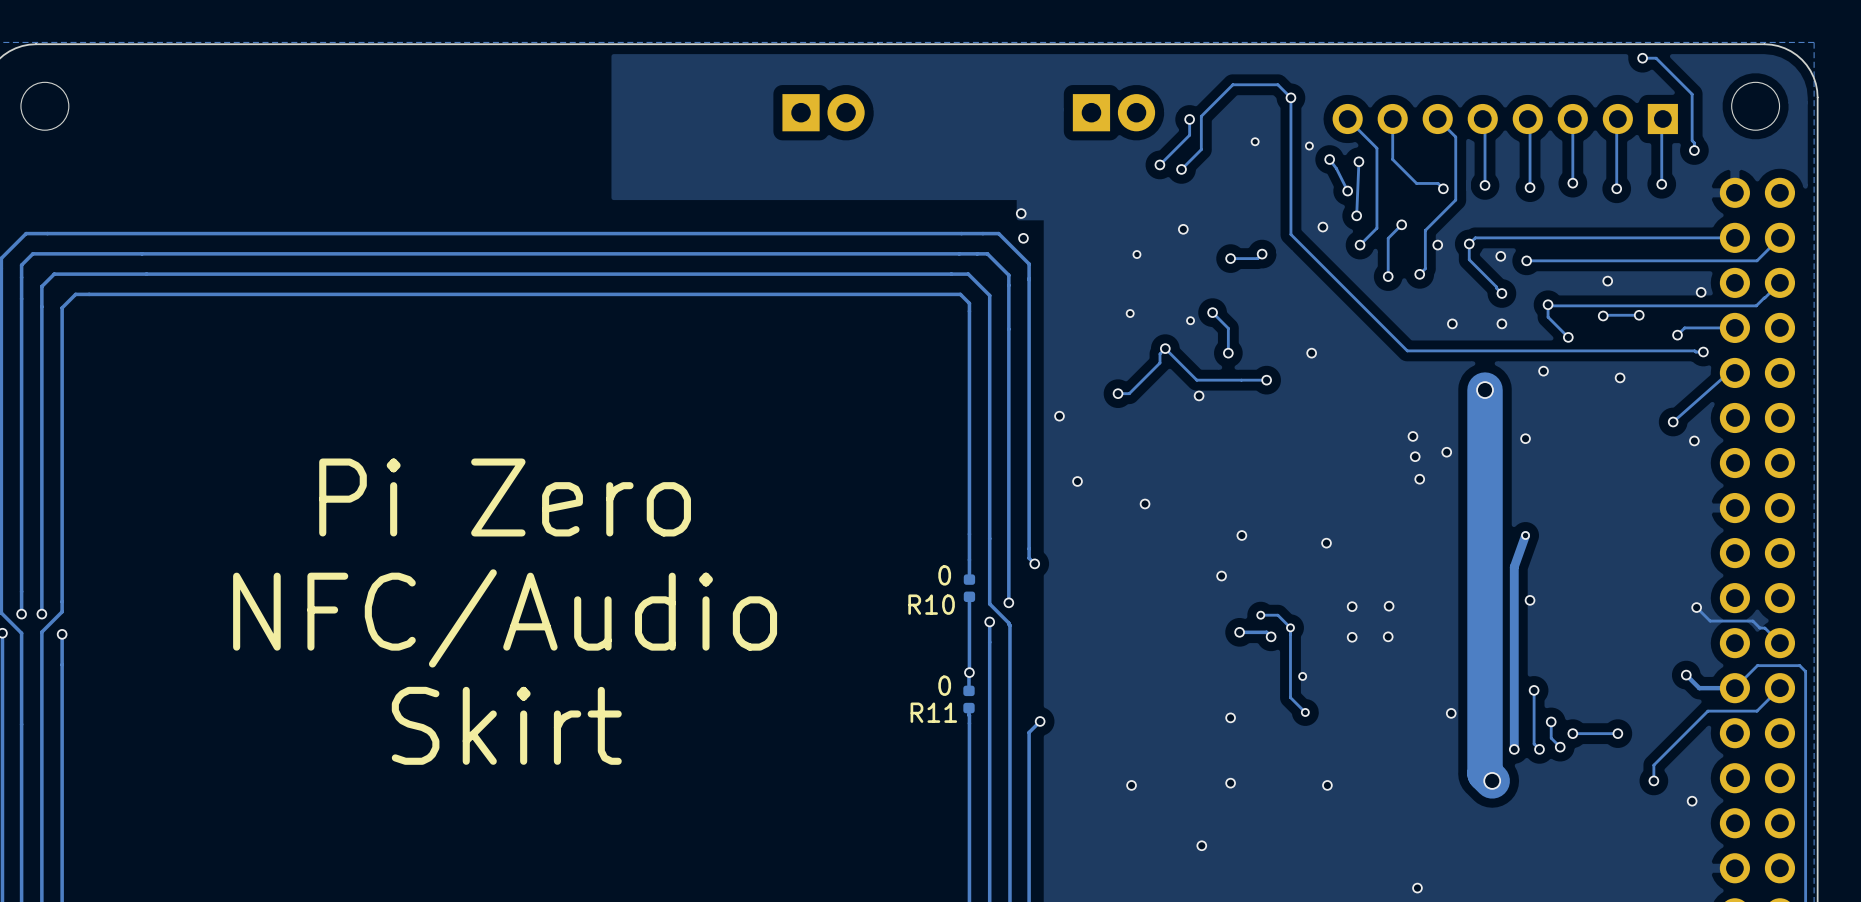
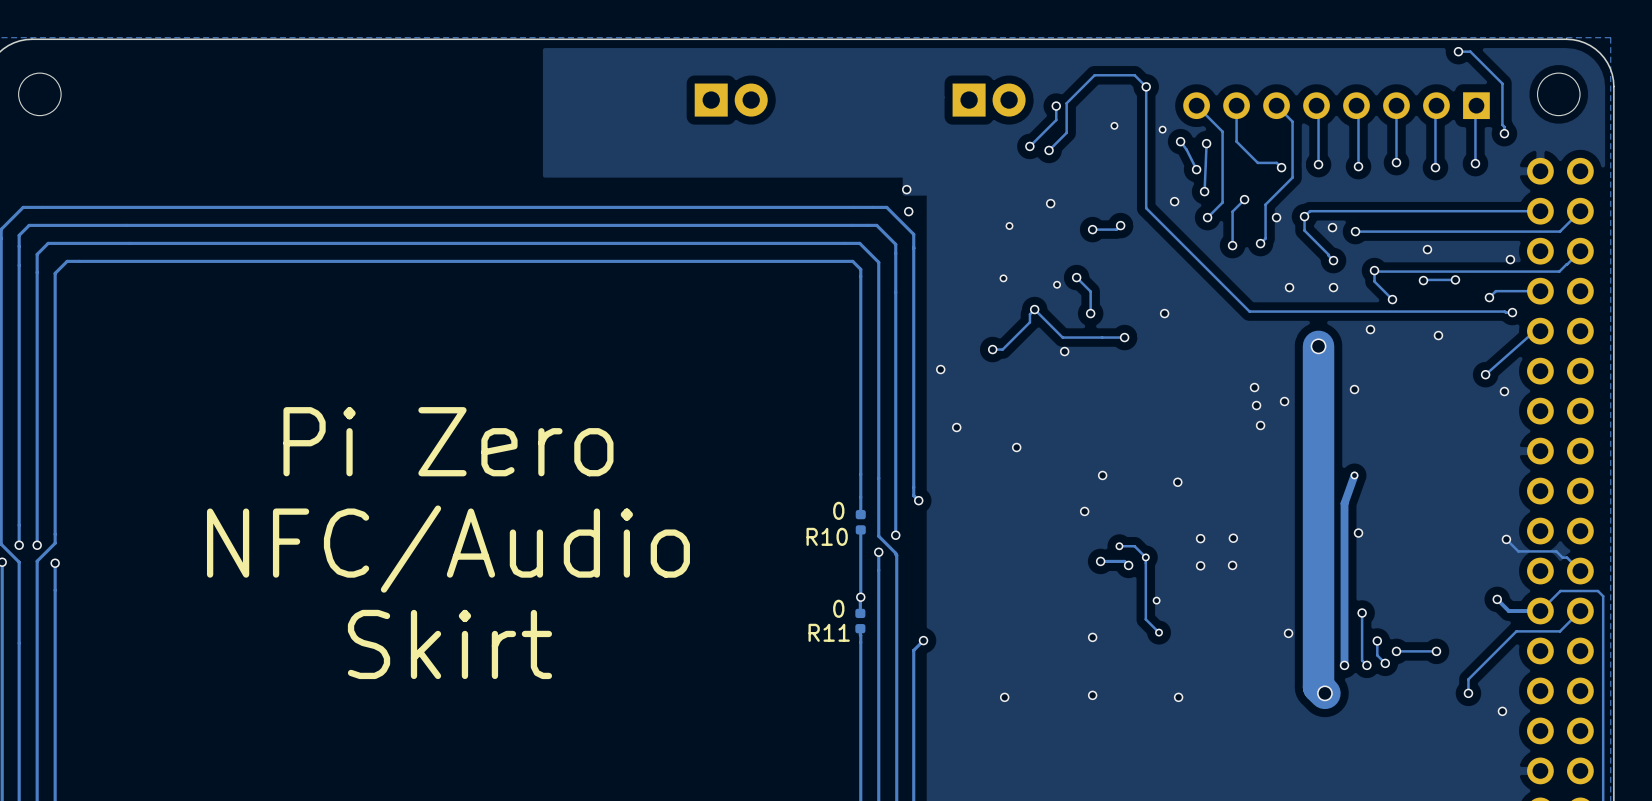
via: (1201, 845) -> none
via: (1417, 888) -> none

